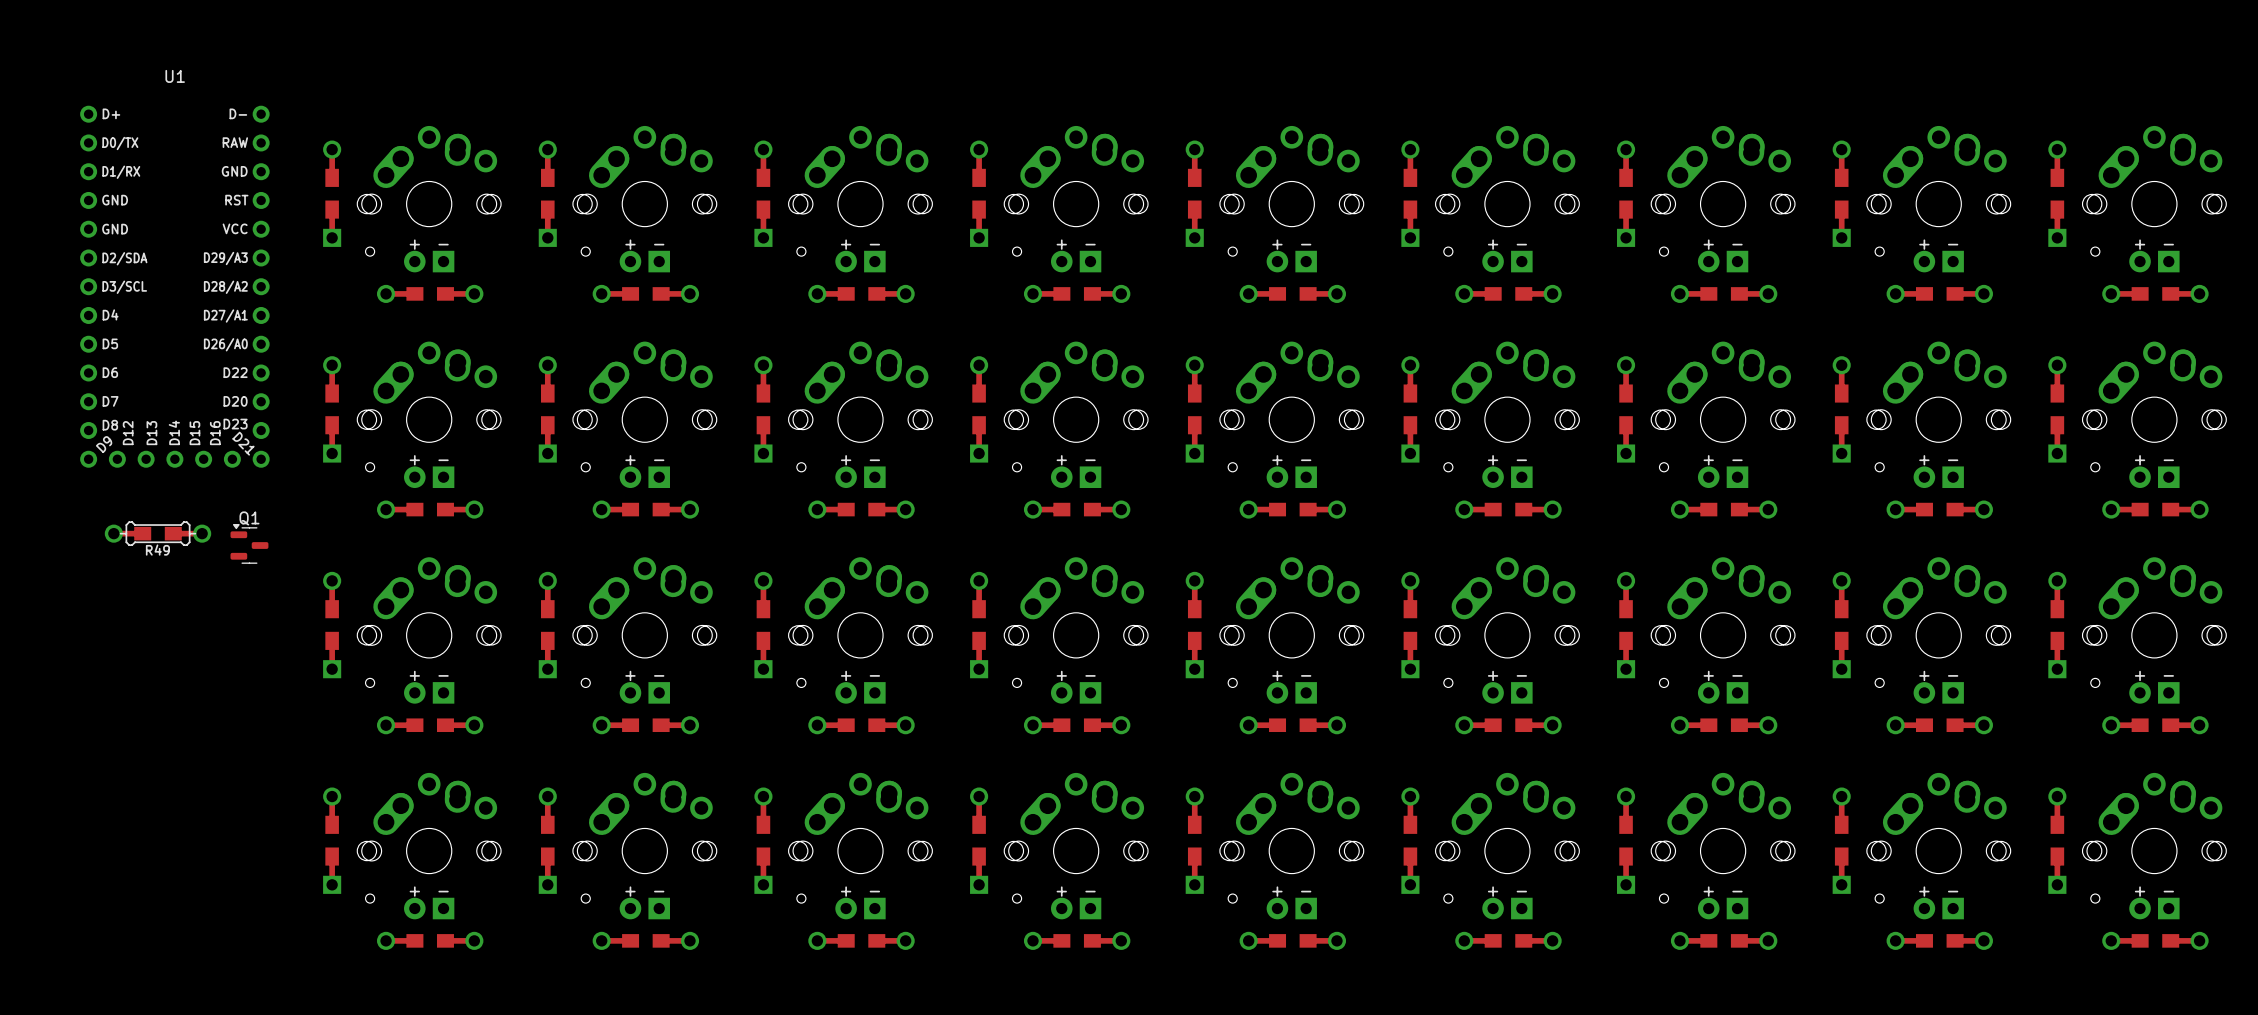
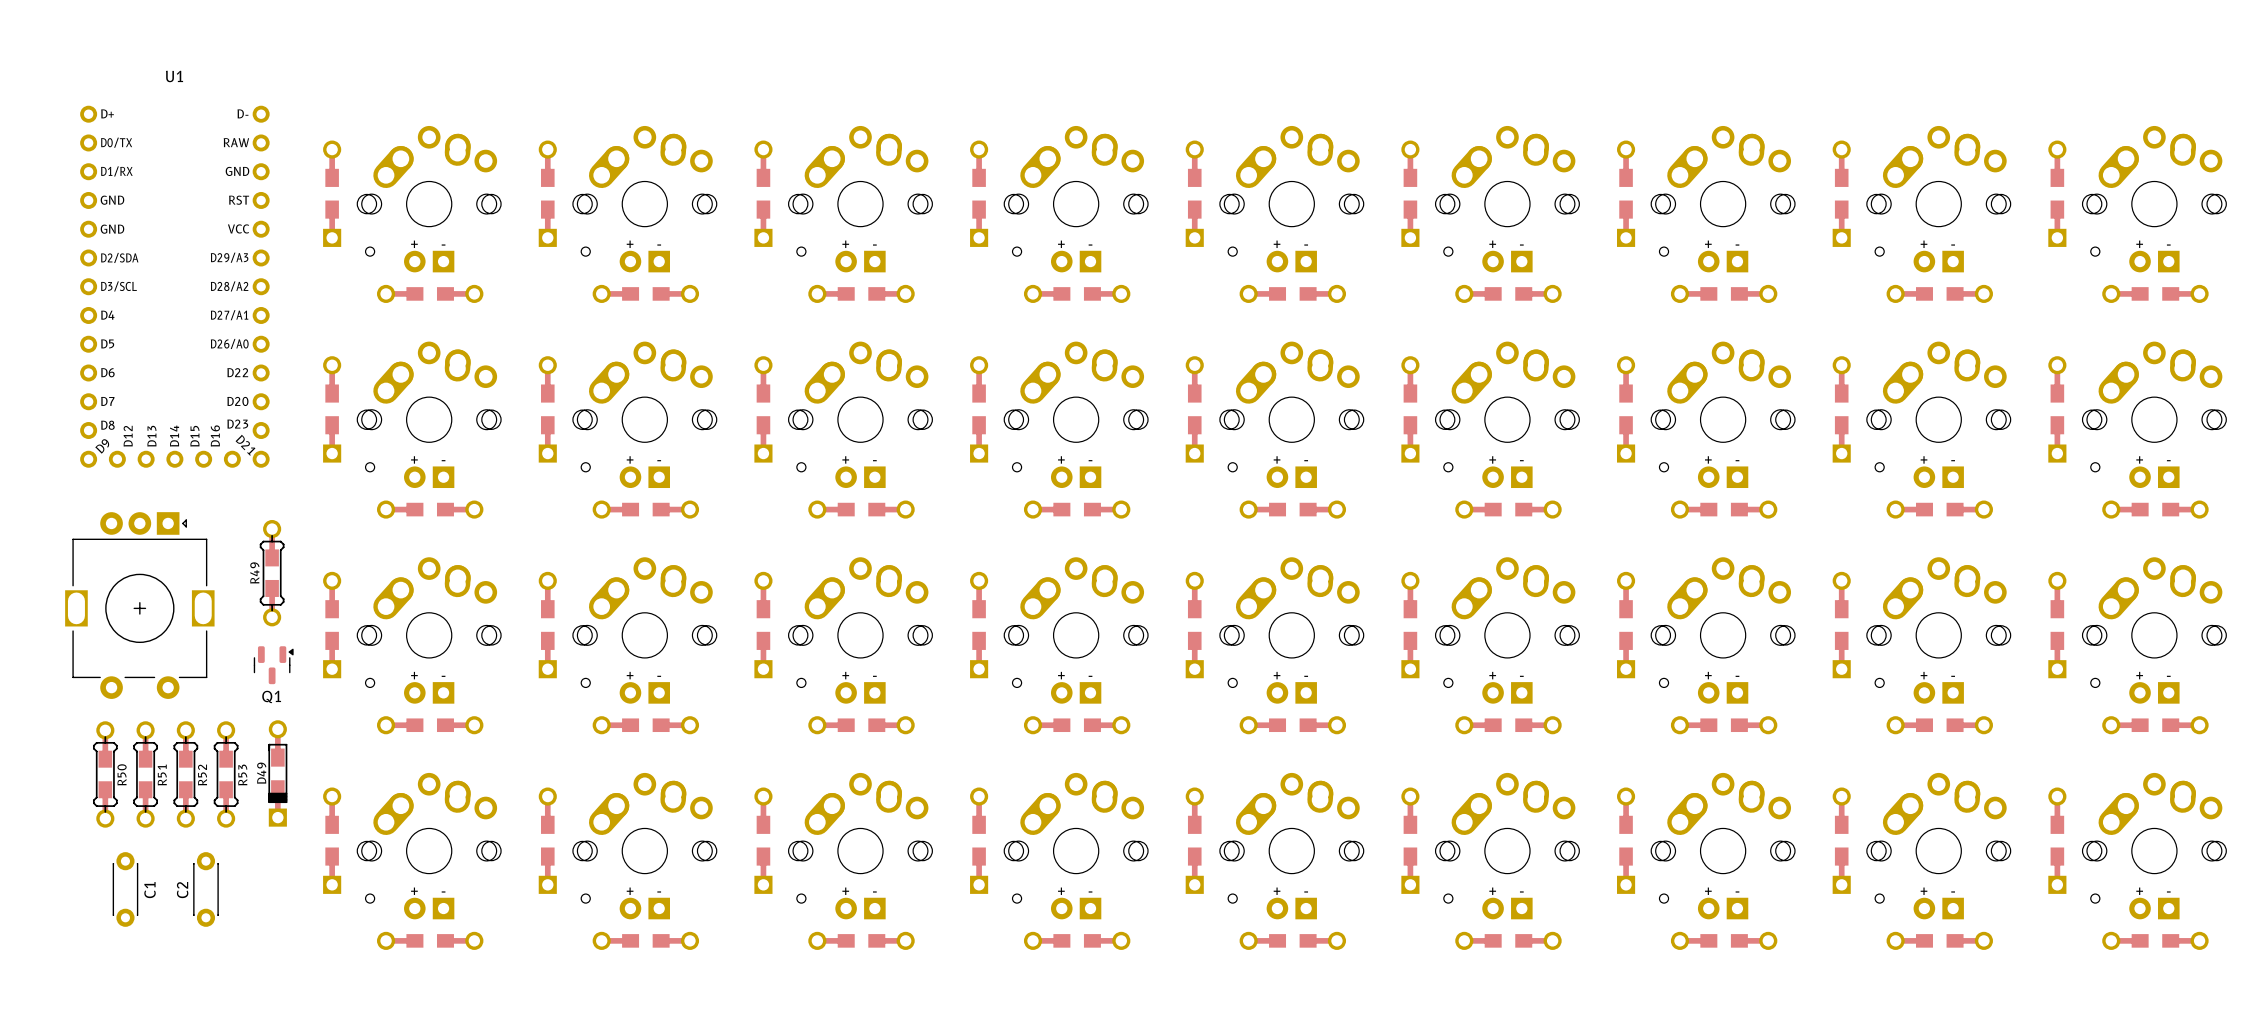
Q1 name position: Q1 (249, 518) -> Q1 (271, 696)
R49 rotation: 0° (158, 533) -> 90° clockwise (272, 573)
R49 position: (158, 533) -> (272, 573)
Q1 rotation: 0° (249, 543) -> 90° clockwise (273, 665)
Q1 position: (249, 543) -> (273, 665)
part: none -> (139, 605)
D49: none -> (277, 773)
R50: none -> (105, 774)
R51: none -> (145, 774)
R52: none -> (185, 774)
R53: none -> (226, 774)
C1: none -> (125, 889)
C2: none -> (205, 889)

